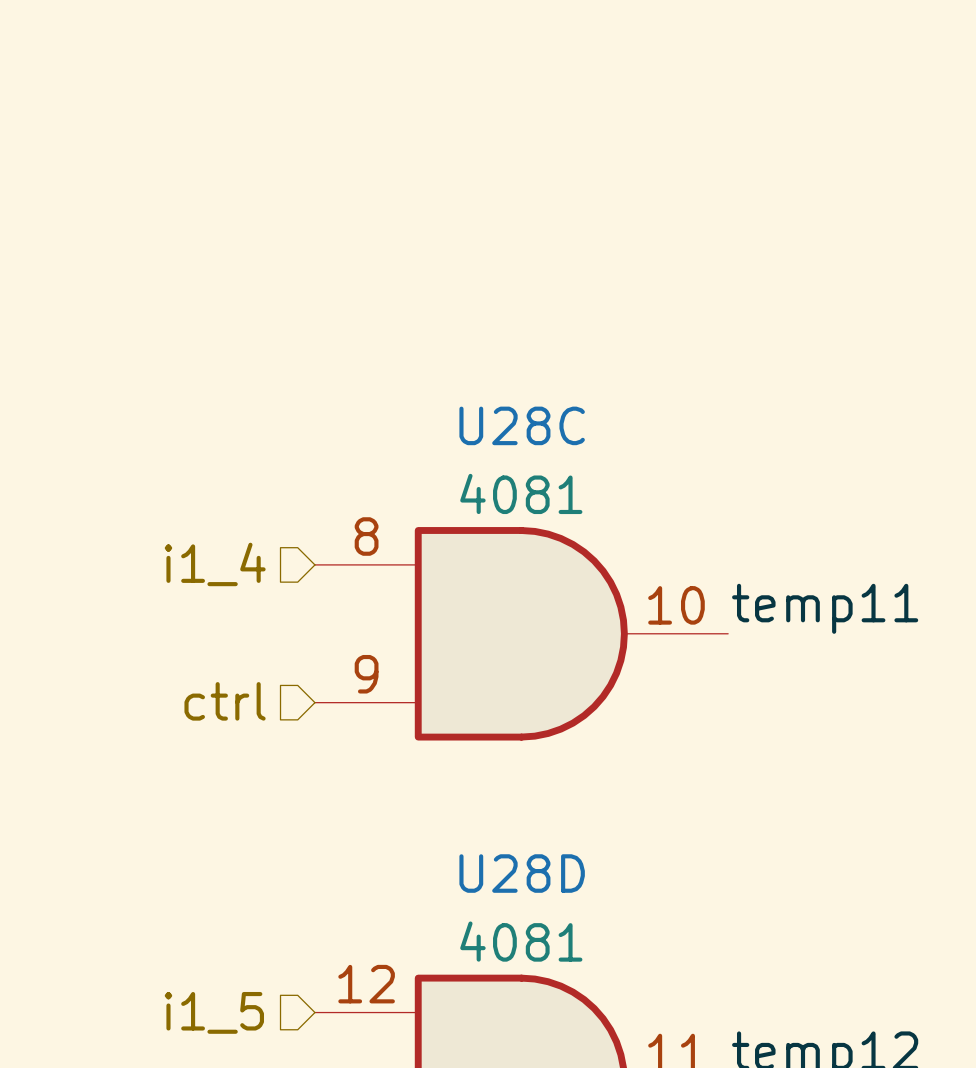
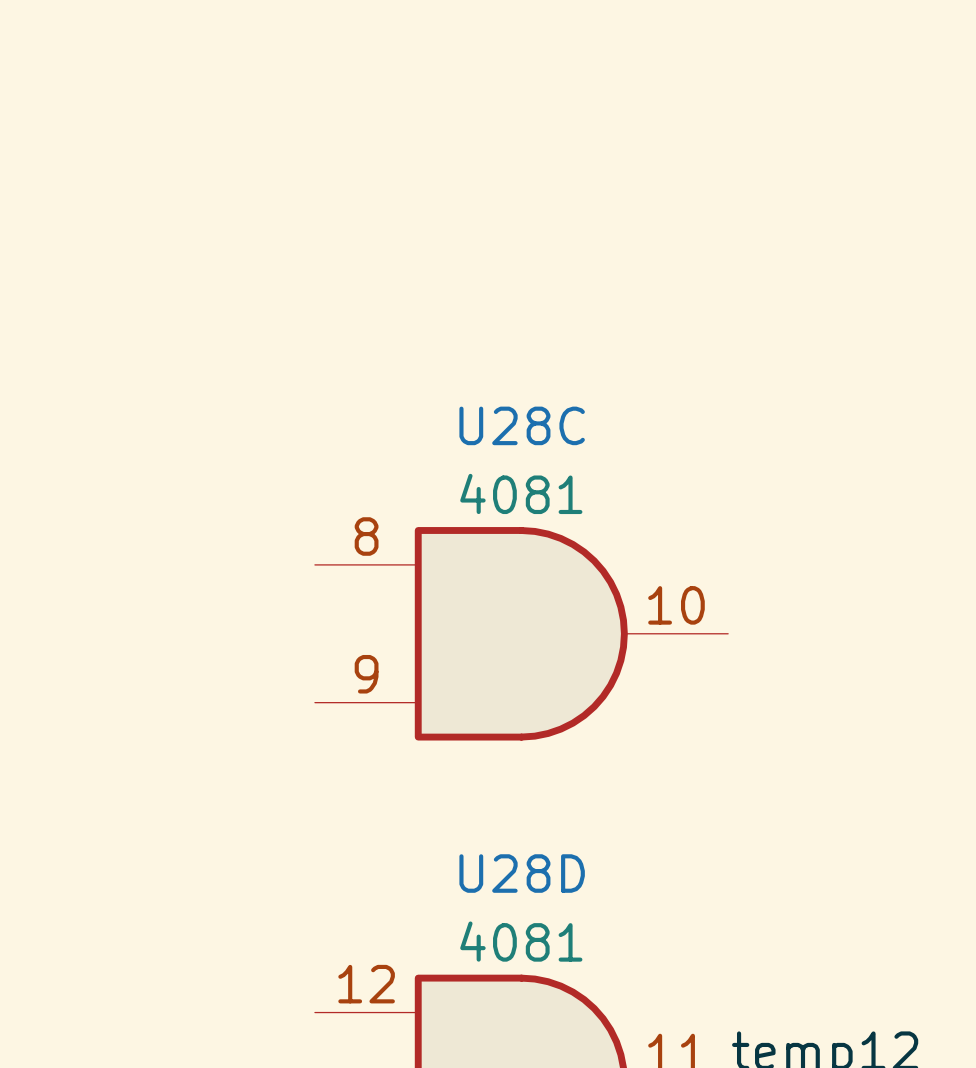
hierarchical label: i1_4 (215, 564) -> none
label: temp11 (825, 608) -> none
hierarchical label: ctrl (225, 701) -> none
hierarchical label: i1_5 (214, 1012) -> none

